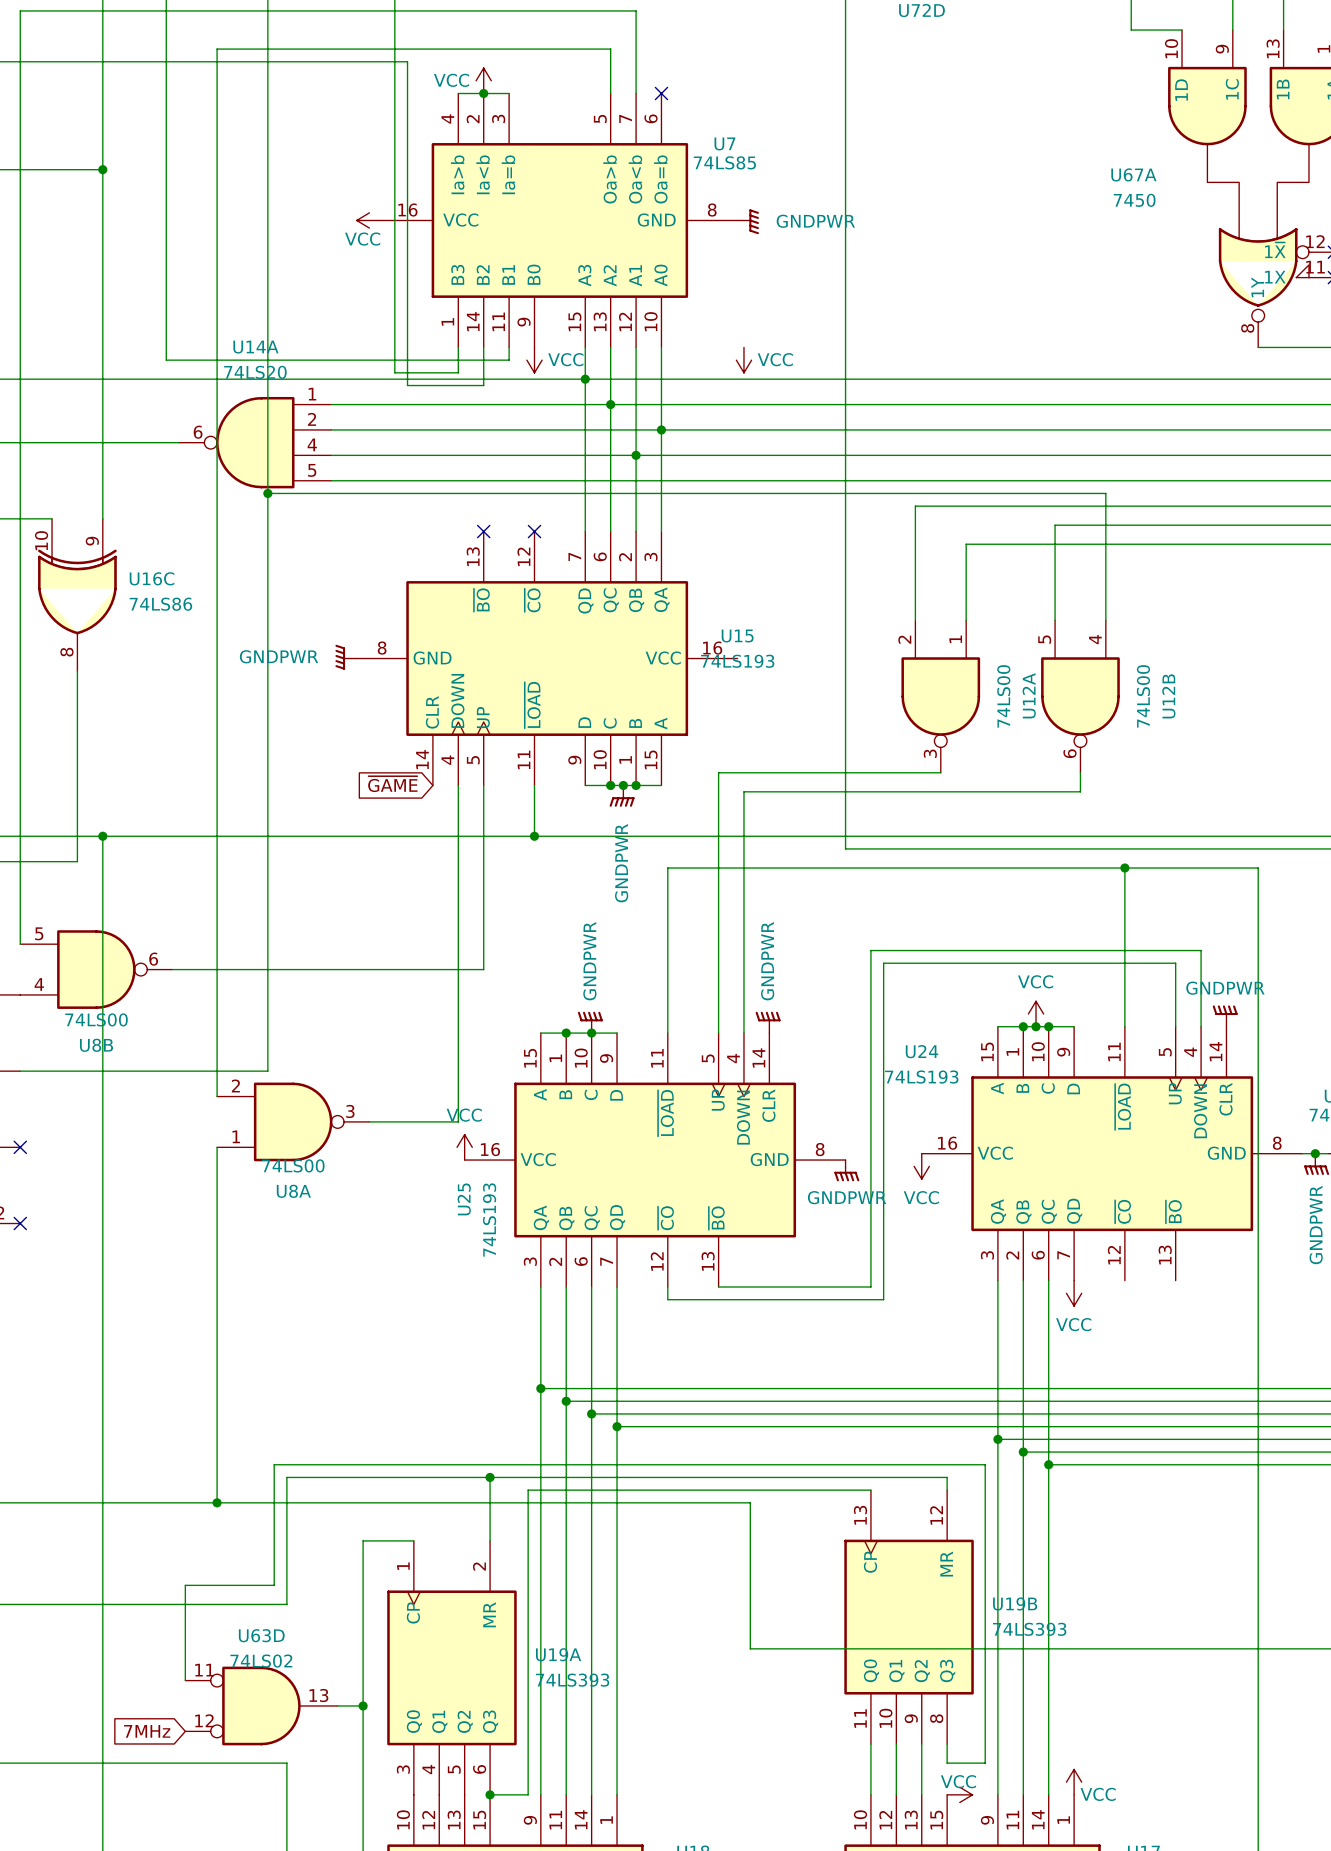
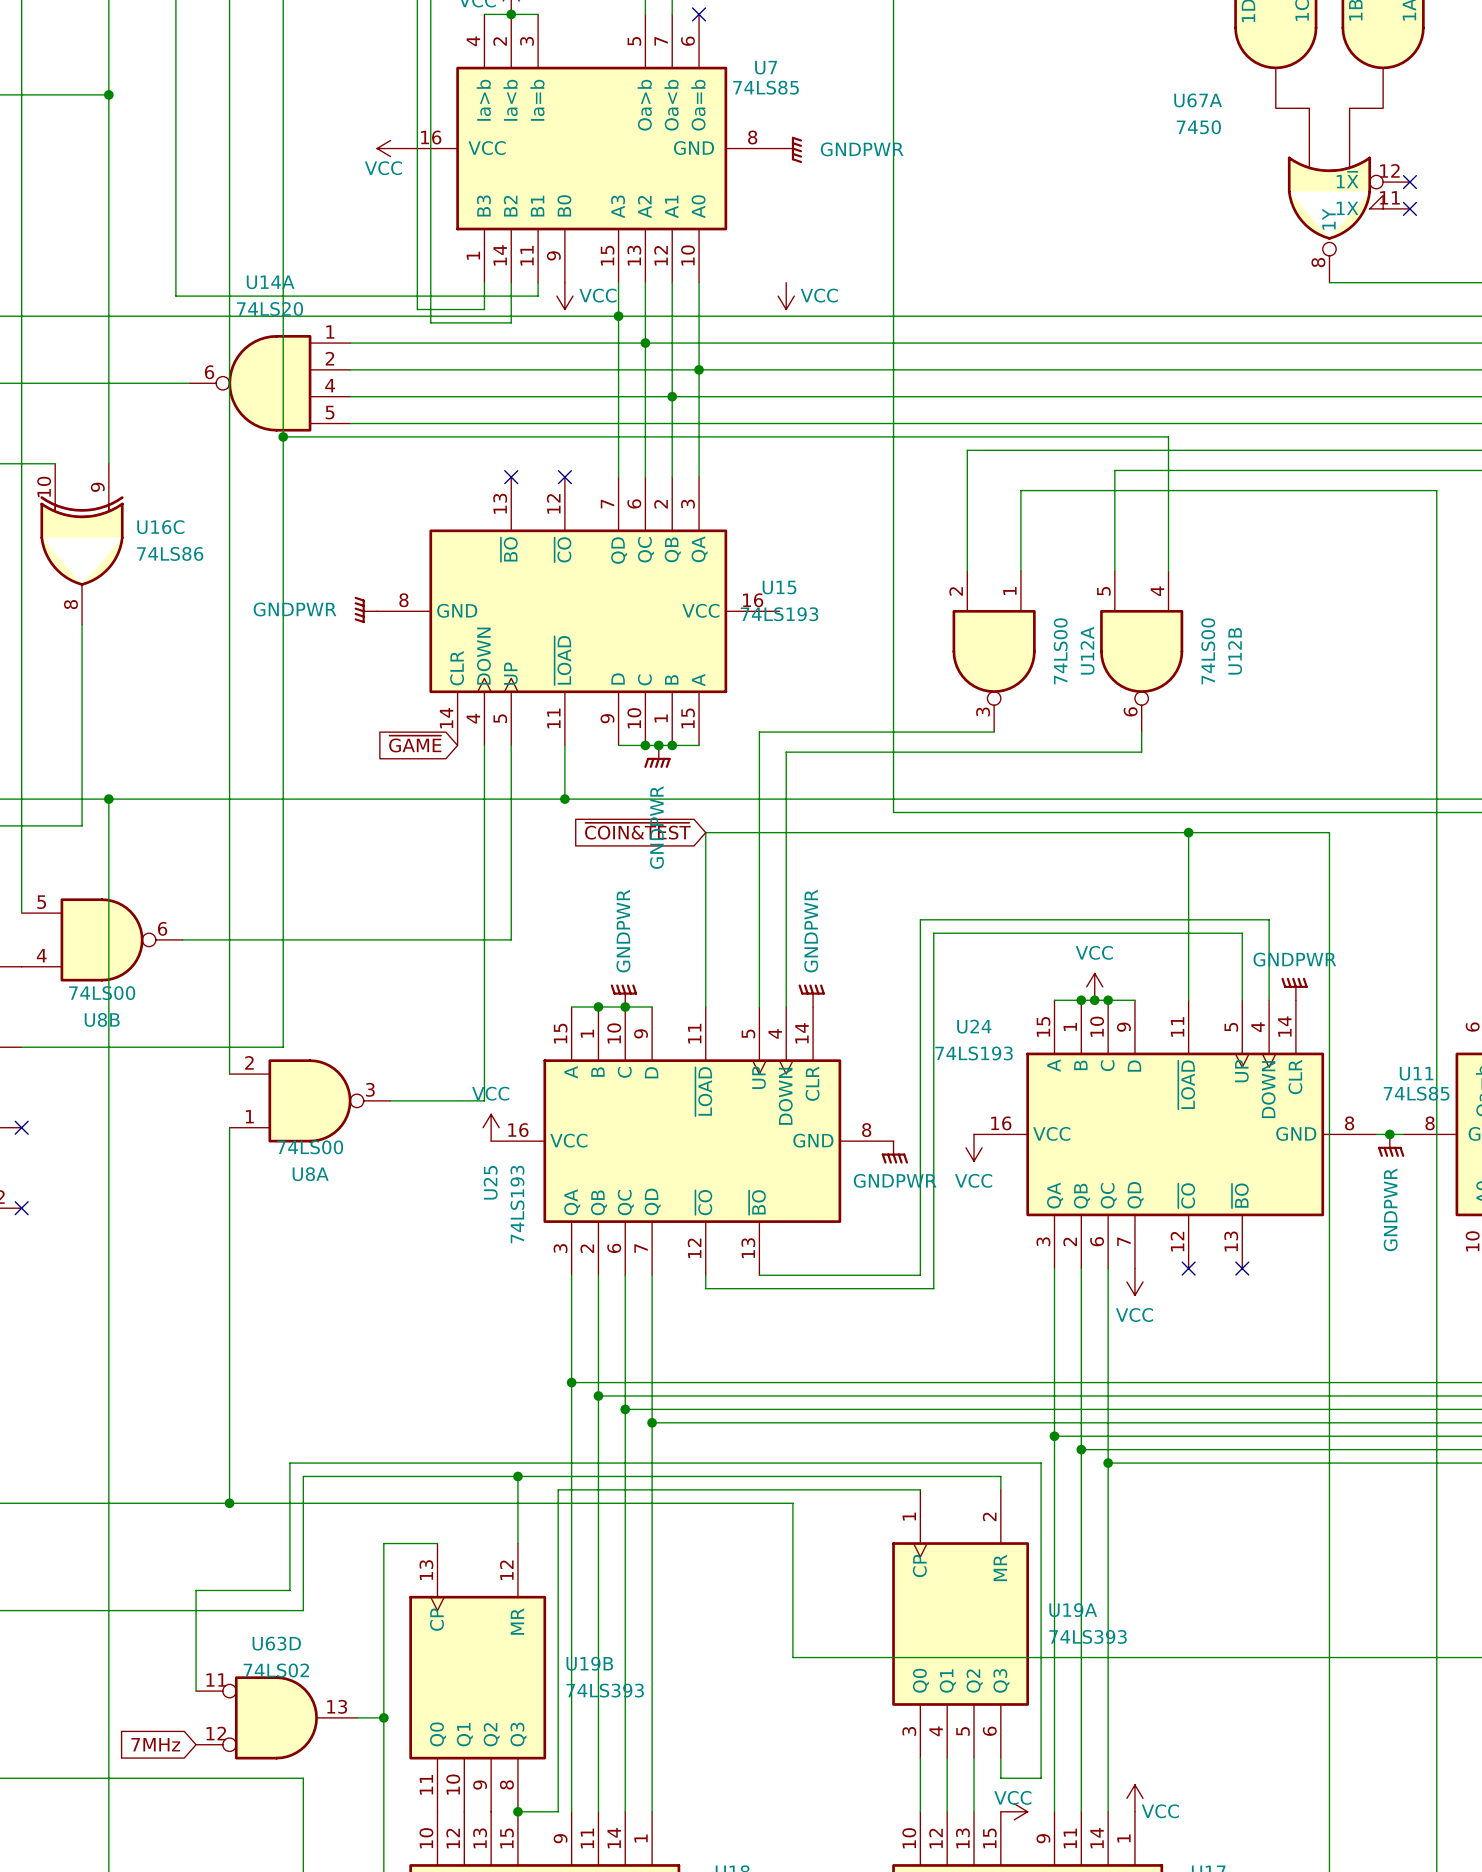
global label: none -> ~{COIN&TEST} (637, 831)
no-connect mark: none -> (1188, 1268)
no-connect mark: none -> (1242, 1268)
U19B position: (909, 1617) -> (477, 1677)
U19A position: (451, 1667) -> (960, 1624)

